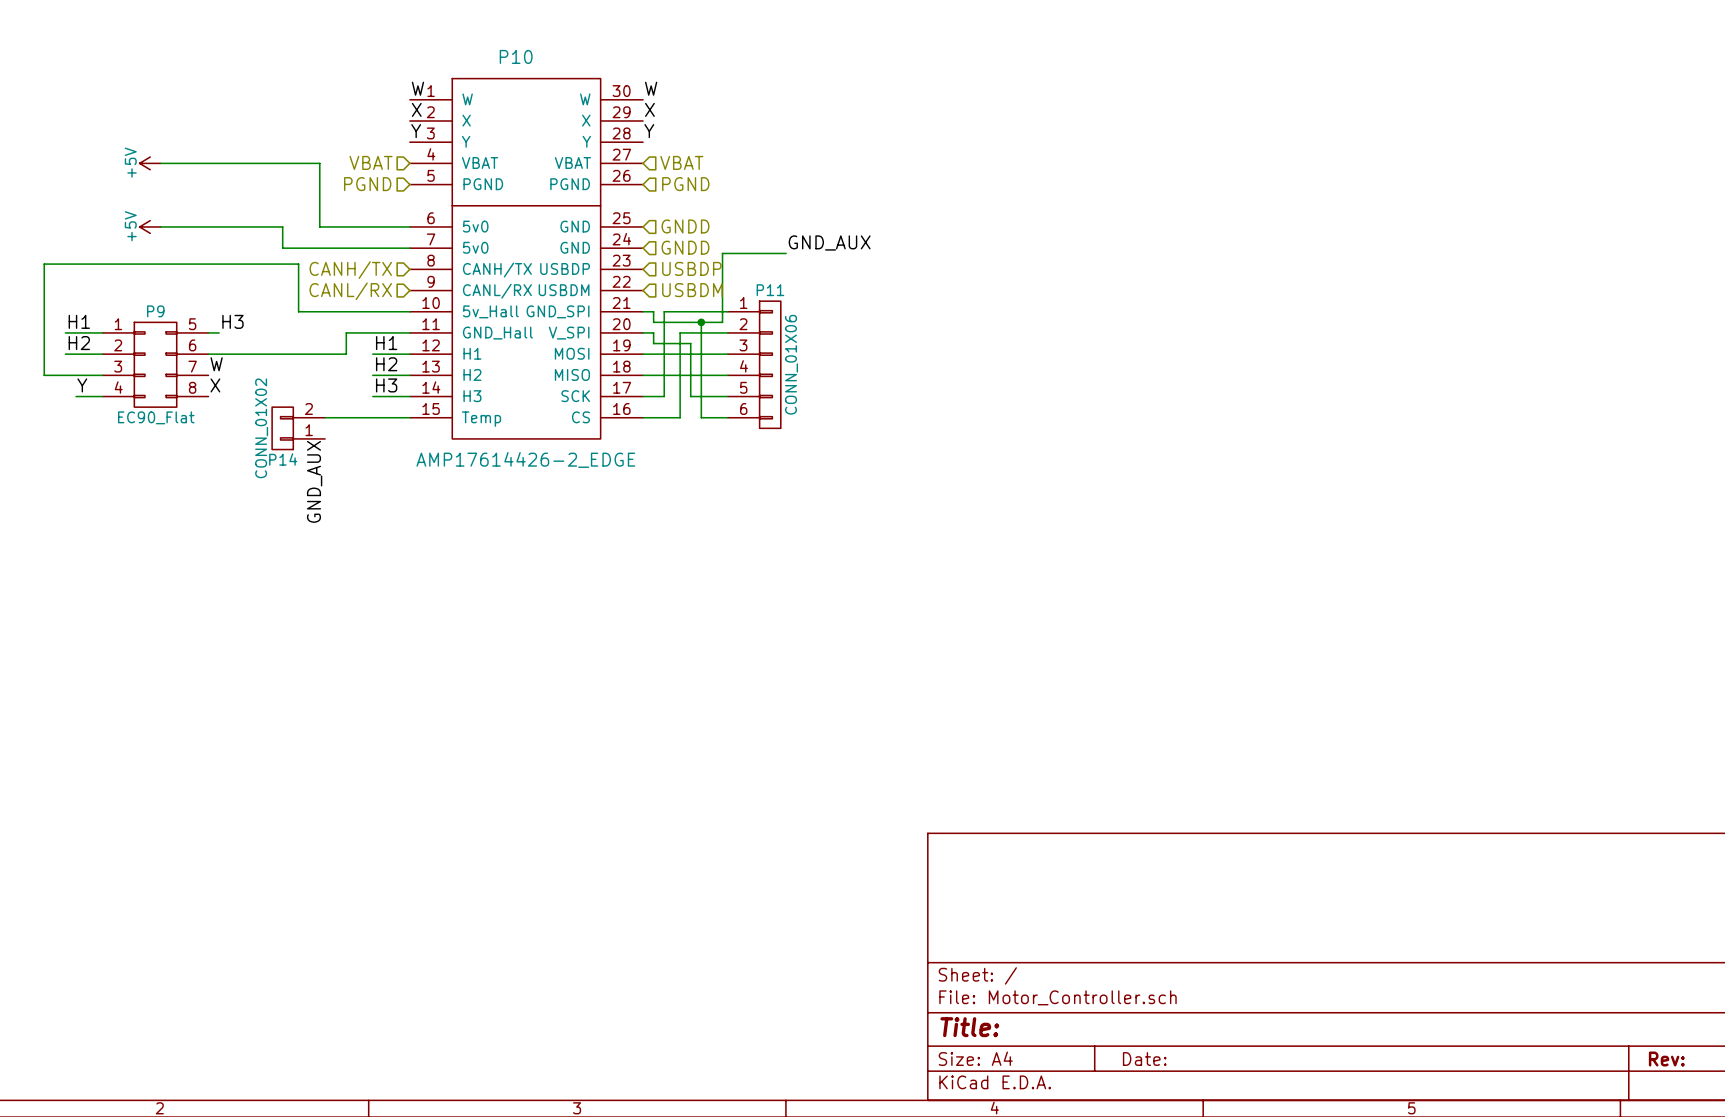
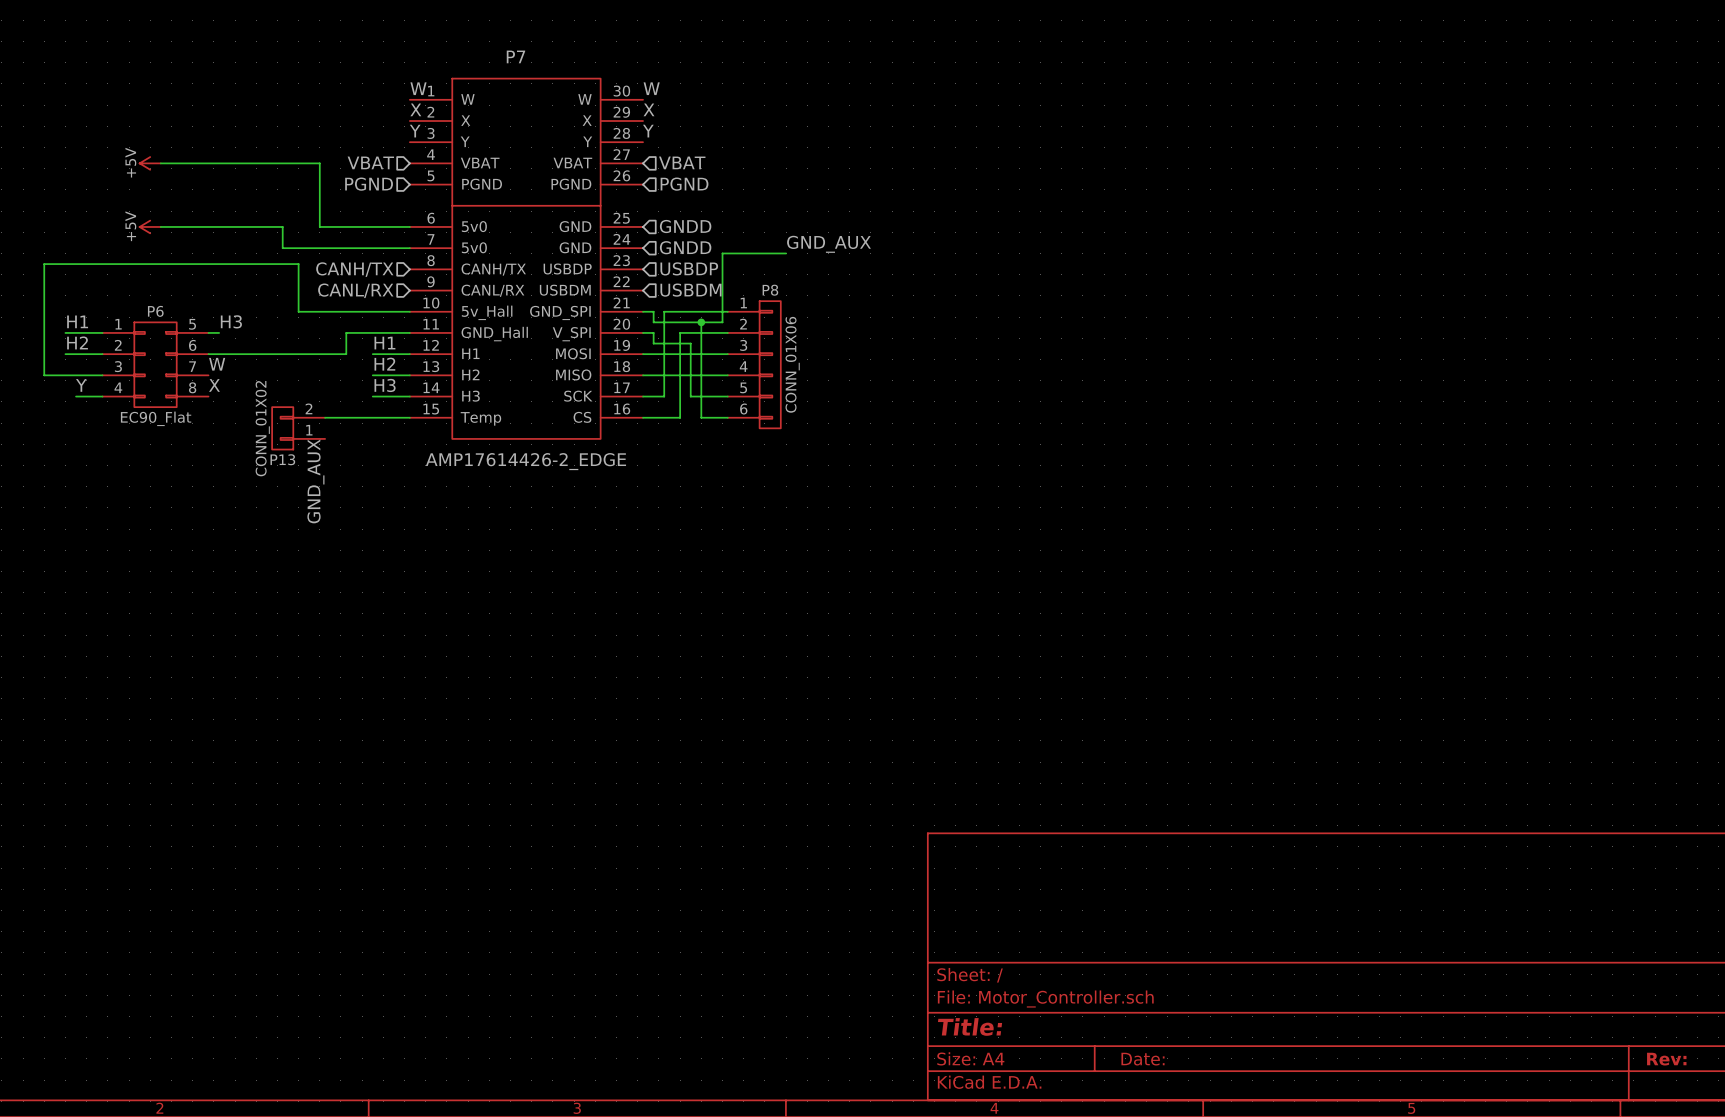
P10 name: P10 (516, 56) -> P7 (515, 56)
P11 name: P11 (770, 290) -> P8 (770, 290)
P9 name: P9 (155, 311) -> P6 (155, 311)
P14 name: P14 (283, 459) -> P13 (282, 459)

